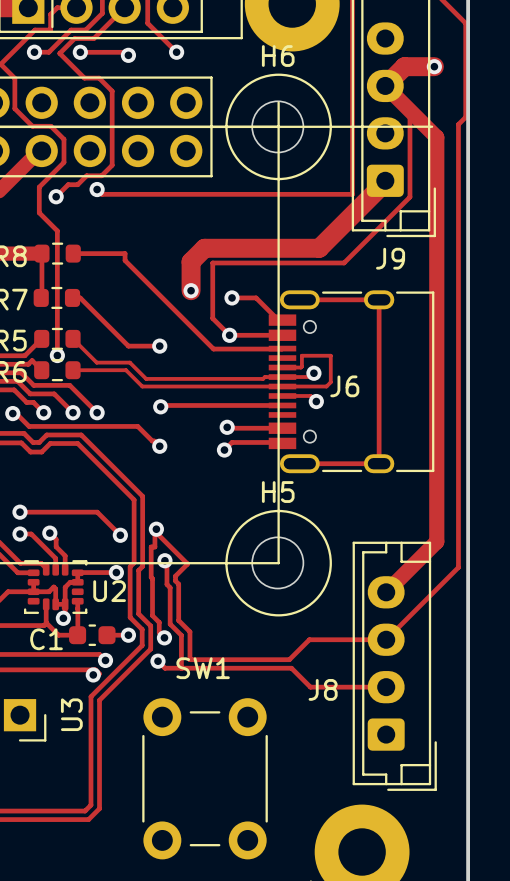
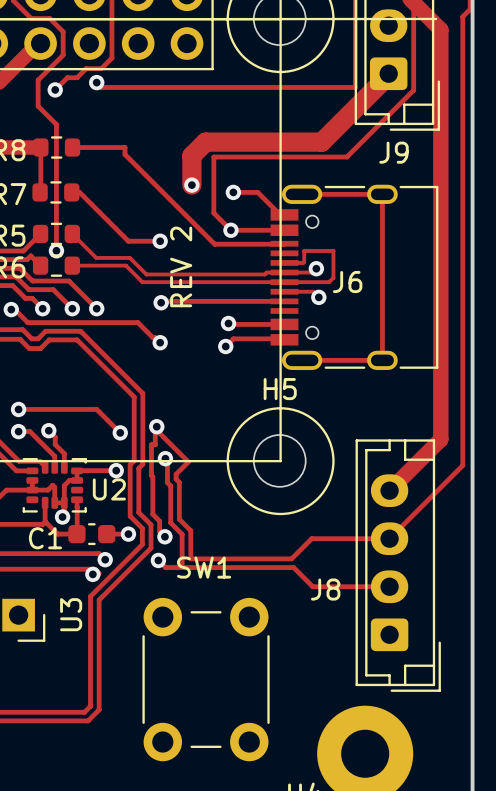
text: none -> REV 2 (181, 266)

